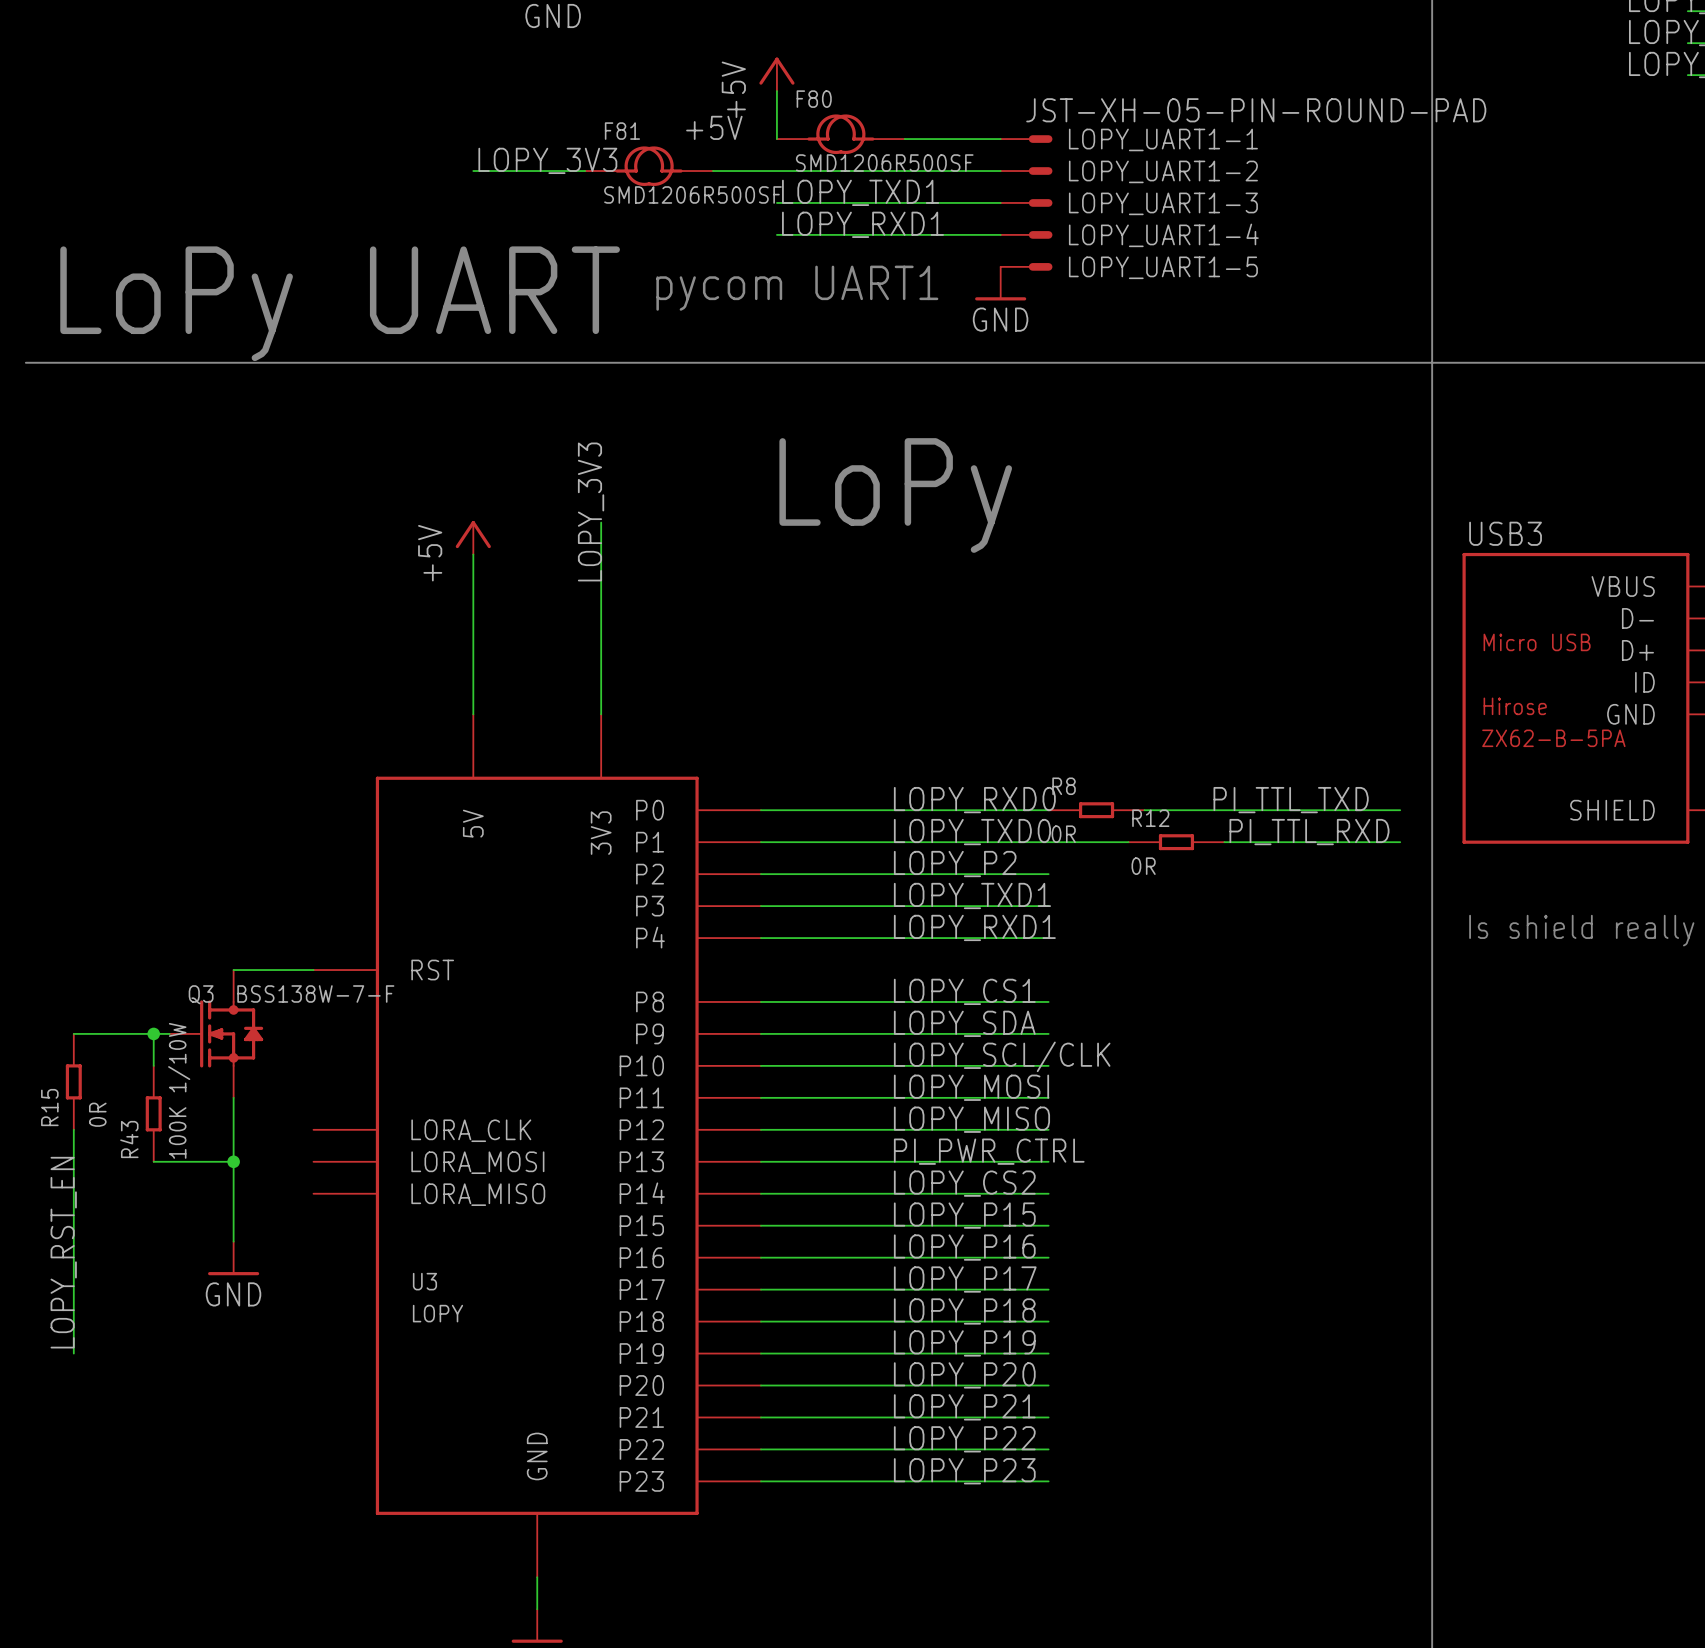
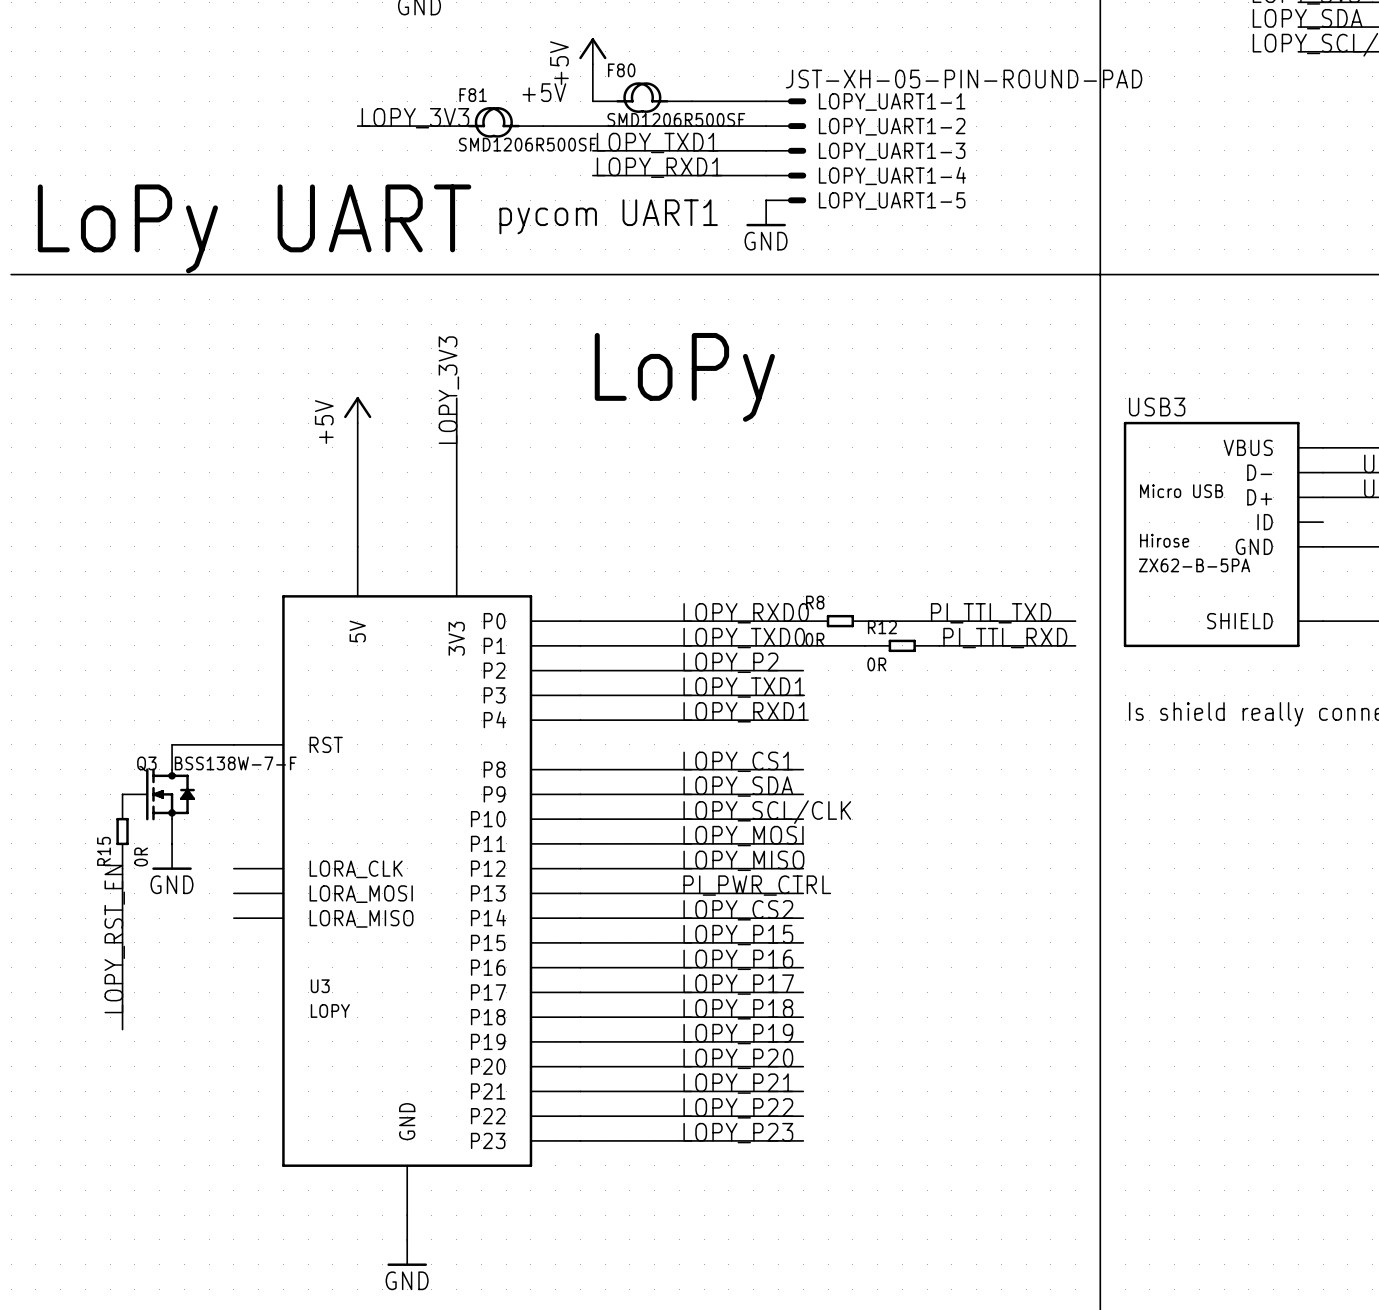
wire: (73, 1033) (169, 1033) -> none
wire: (153, 1033) (153, 1065) -> none
junction: (153, 1033) -> none
R15 position: (73, 1081) -> (122, 831)
wire: (233, 1097) (233, 1241) -> none
R43: 100K 1/10W (153, 1113) -> none
wire: (73, 1129) (73, 1353) -> none
wire: none -> (122, 868) (122, 1029)
wire: (153, 1161) (233, 1161) -> none
junction: (233, 1161) -> none
label position: LOPY_RST_EN (63, 1252) -> LOPY_RST_EN (114, 939)
power symbol position: GND (233, 1258) -> GND (172, 856)

